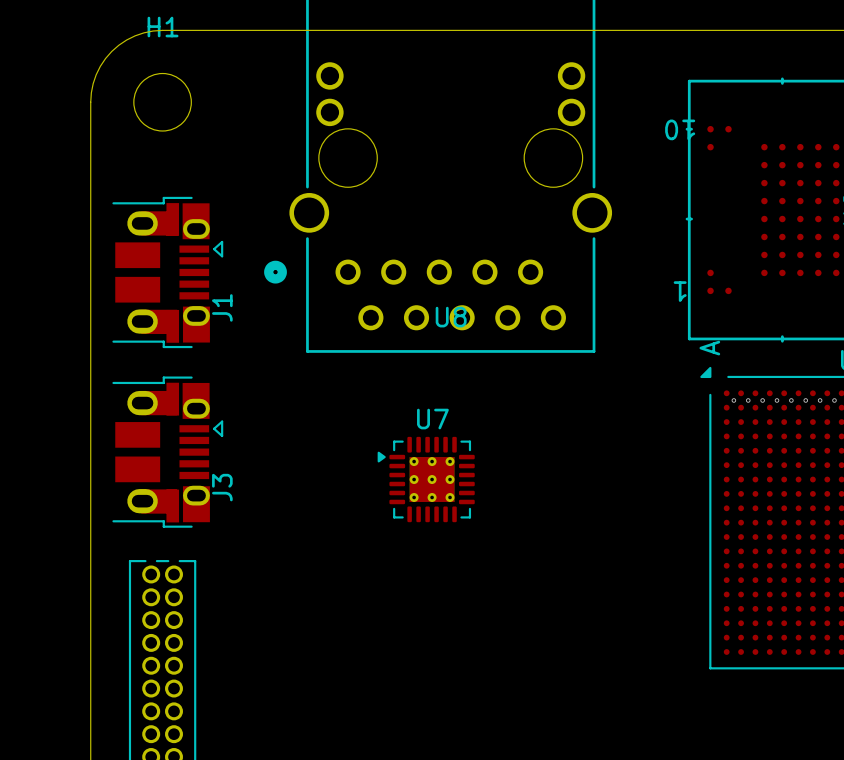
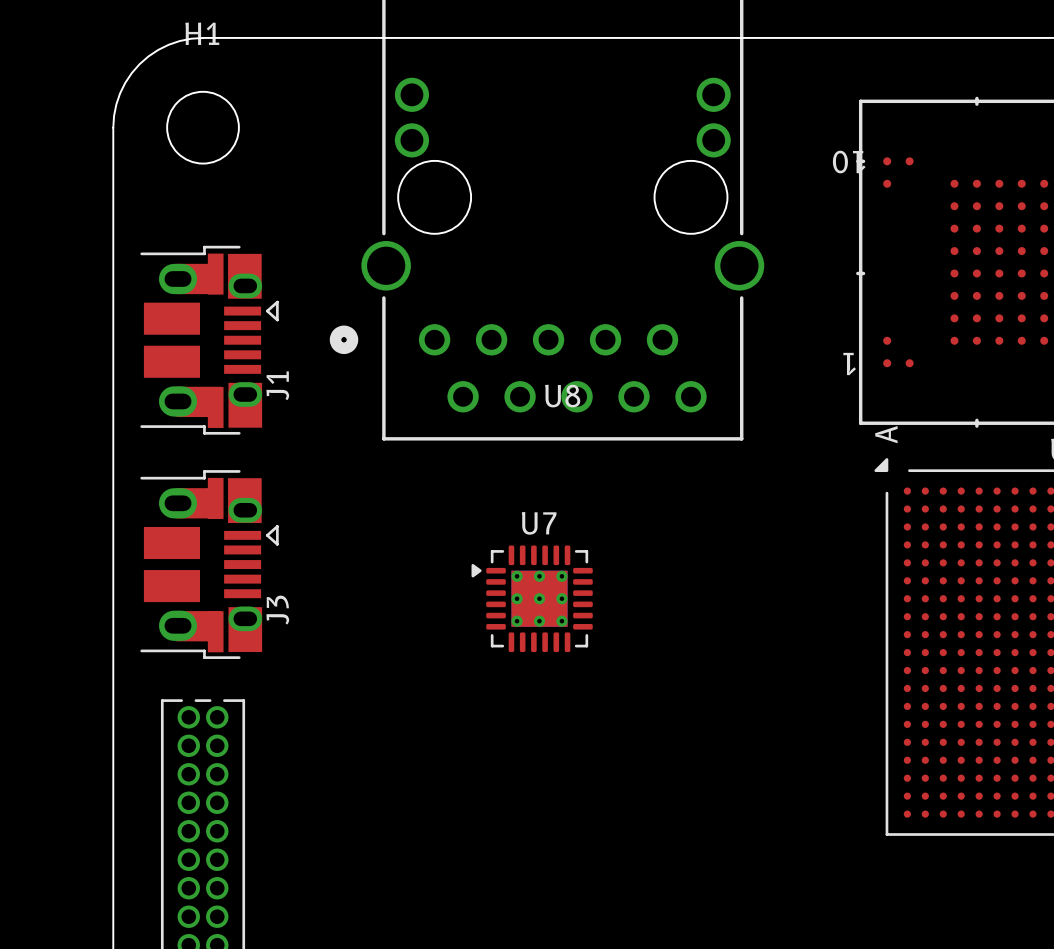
via: (733, 400) -> none
via: (748, 400) -> none
via: (762, 400) -> none
via: (776, 400) -> none
via: (791, 400) -> none
via: (805, 400) -> none
via: (820, 400) -> none
via: (834, 400) -> none

